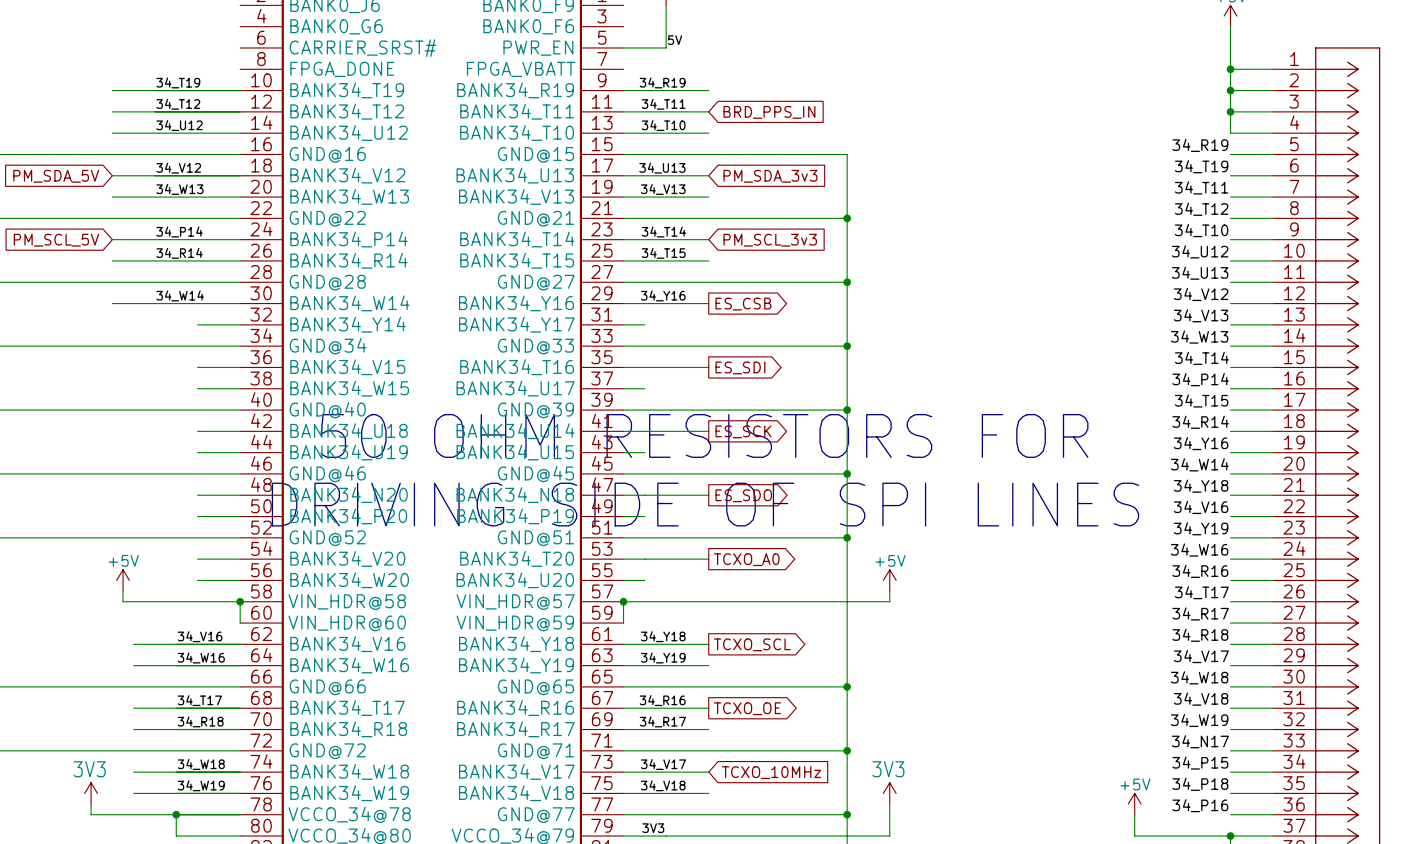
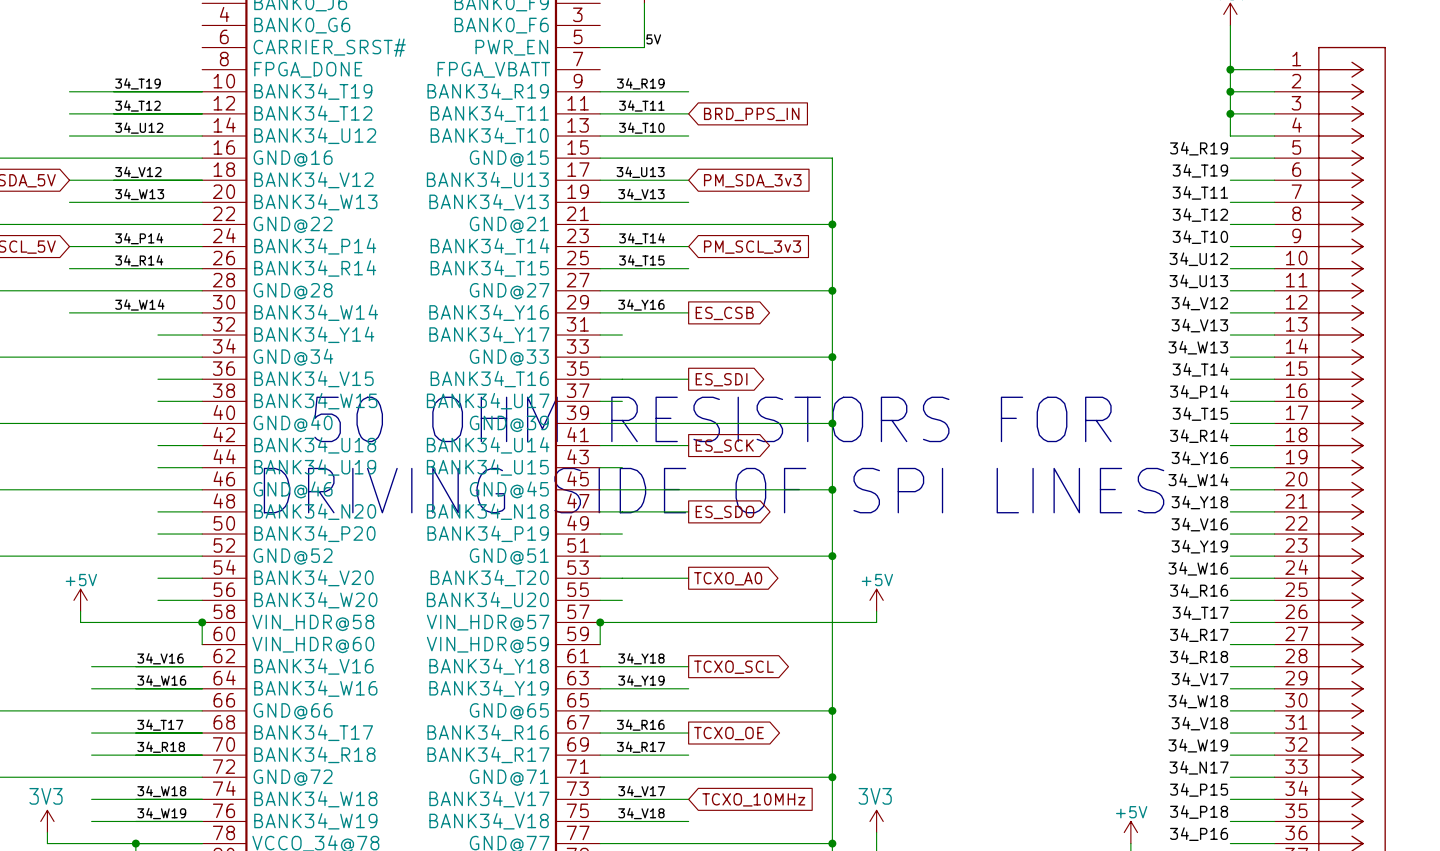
text position: 50 OHM RESISTORS FOR (704, 435) -> 50 OHM RESISTORS FOR (712, 419)
text position: DRIVING SIDE OF SPI LINES (705, 504) -> DRIVING SIDE OF SPI LINES (714, 490)

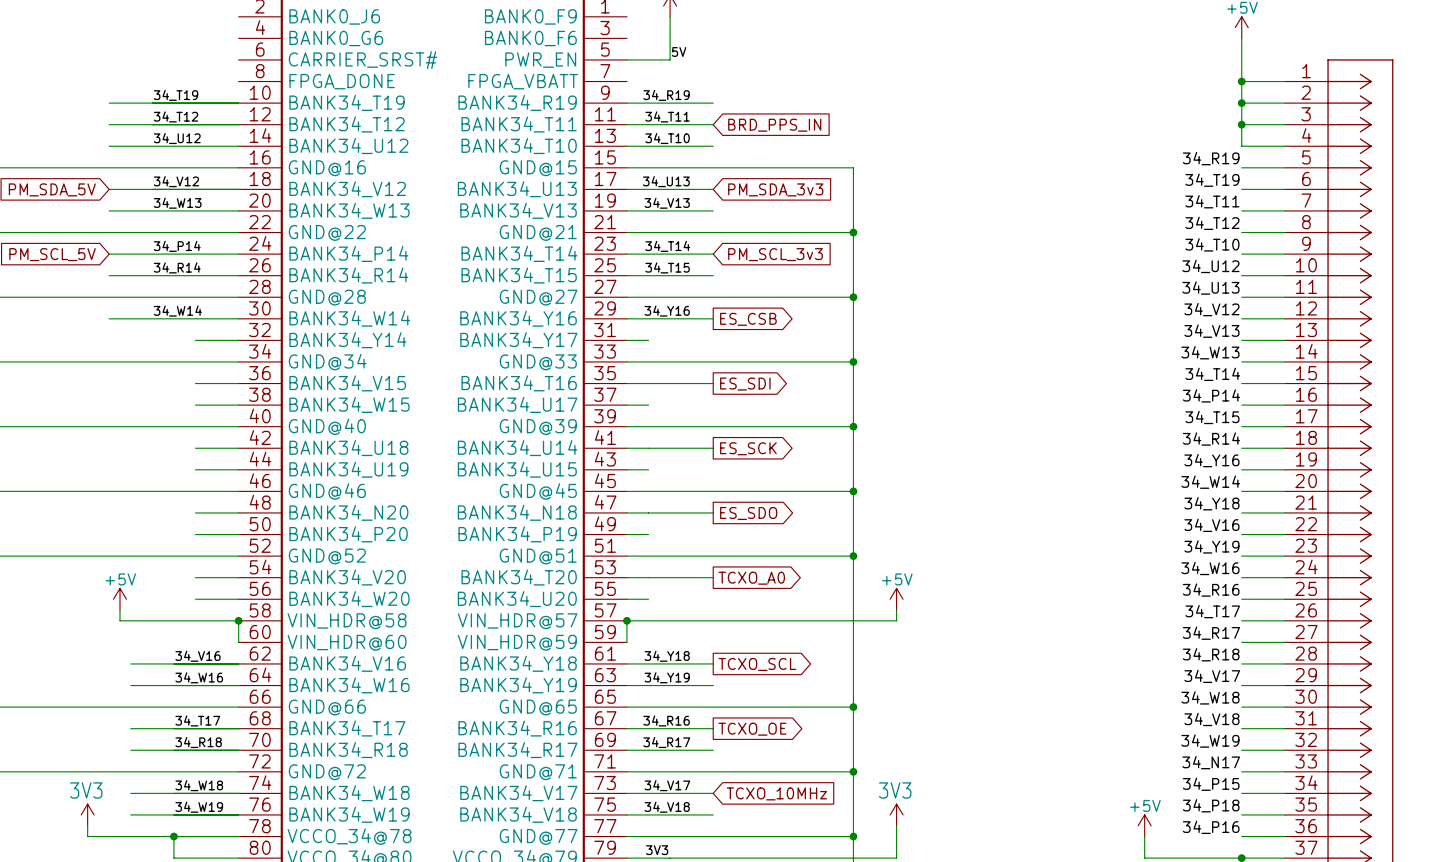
text: 50 OHM RESISTORS FOR (712, 419) -> none
text: DRIVING SIDE OF SPI LINES (714, 490) -> none

